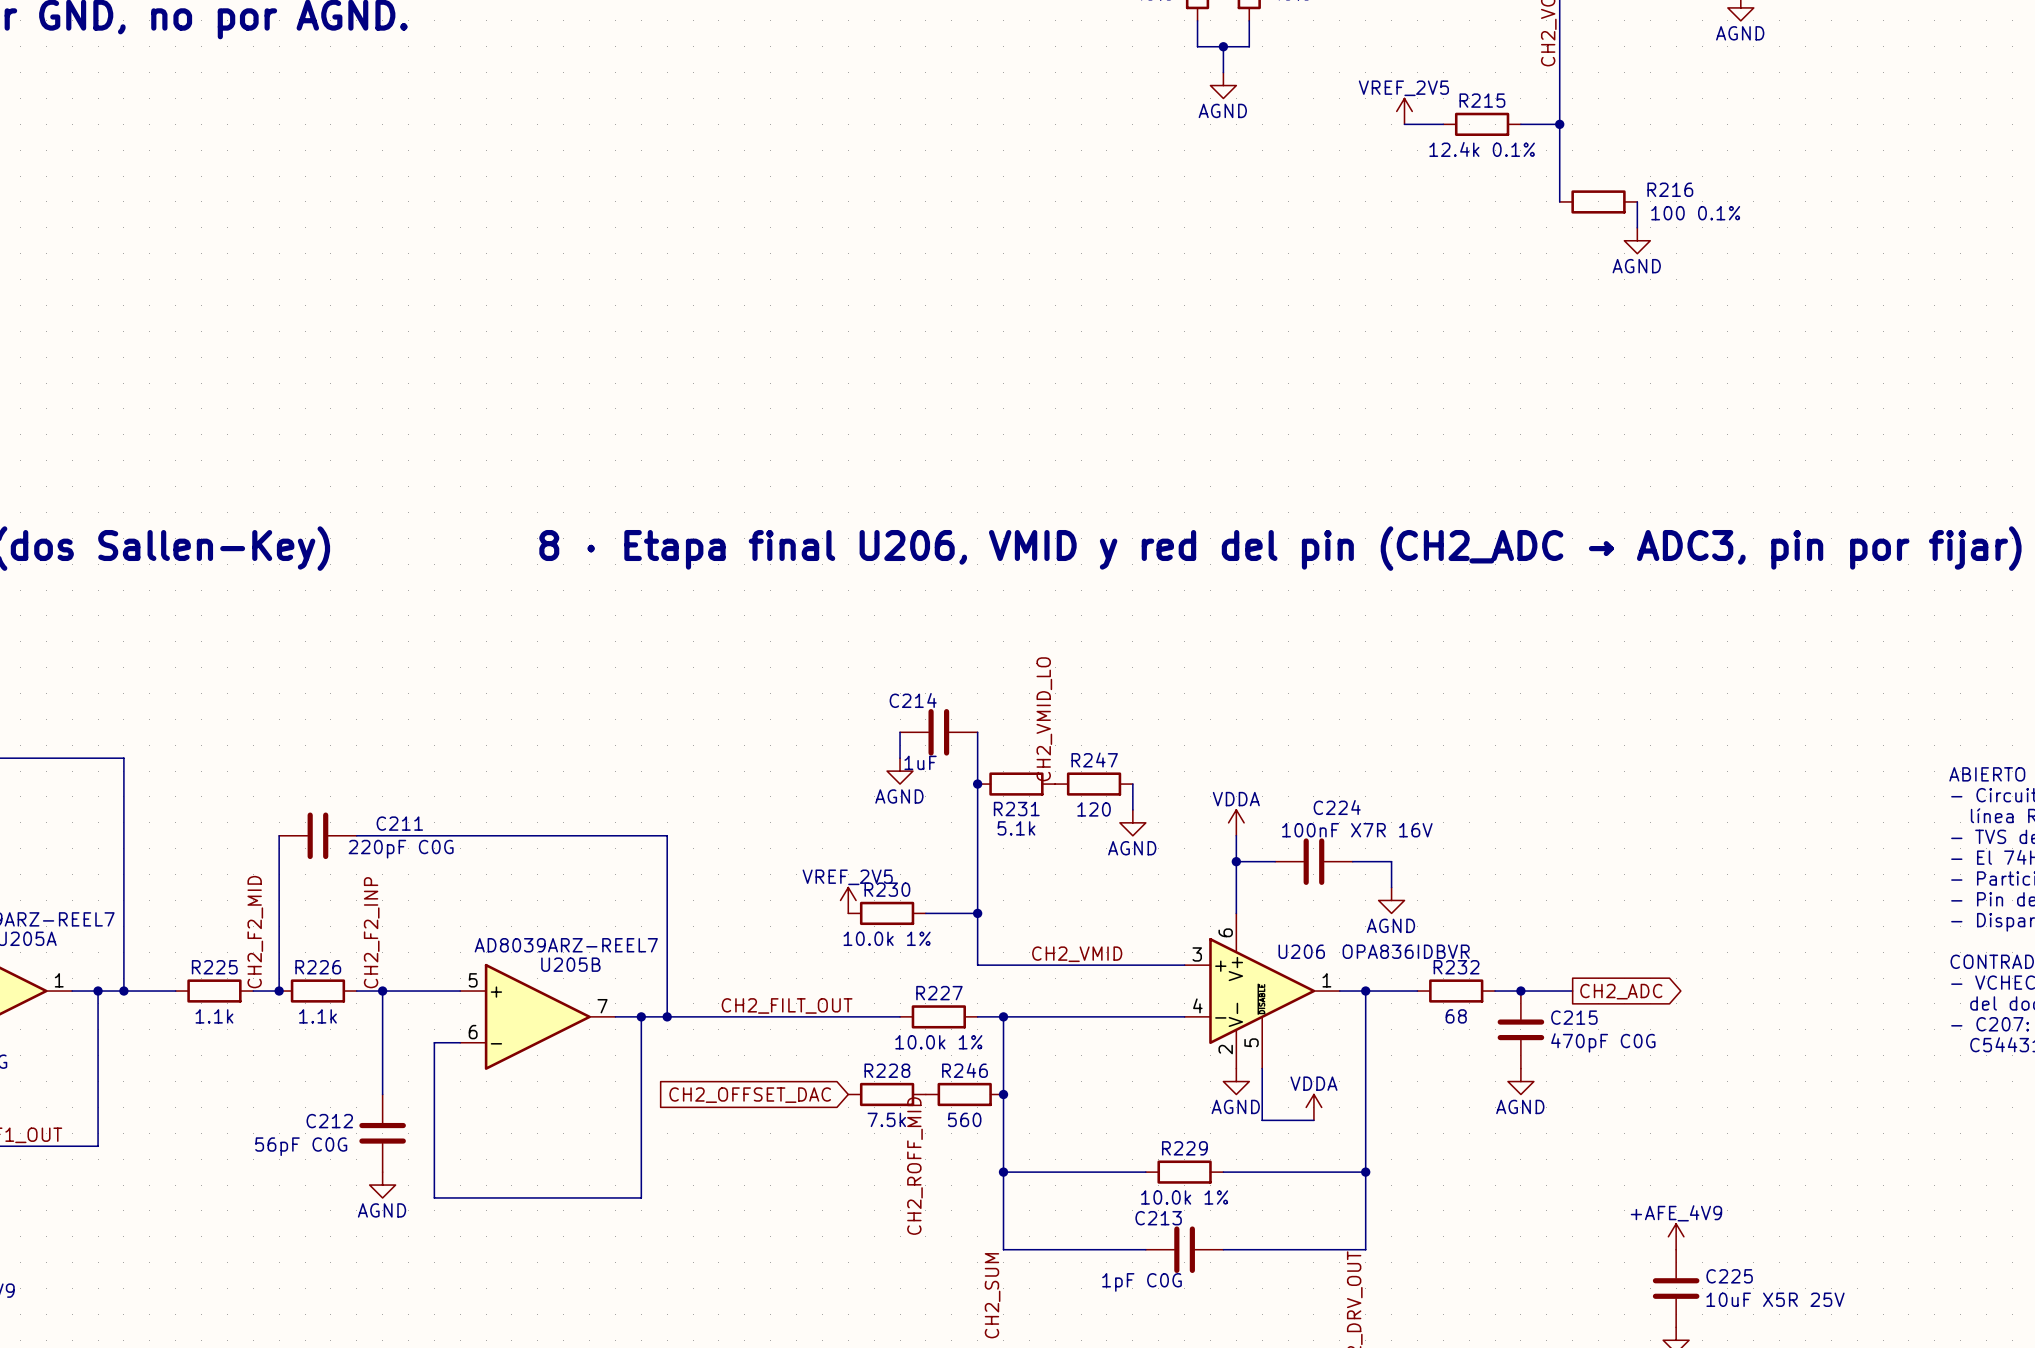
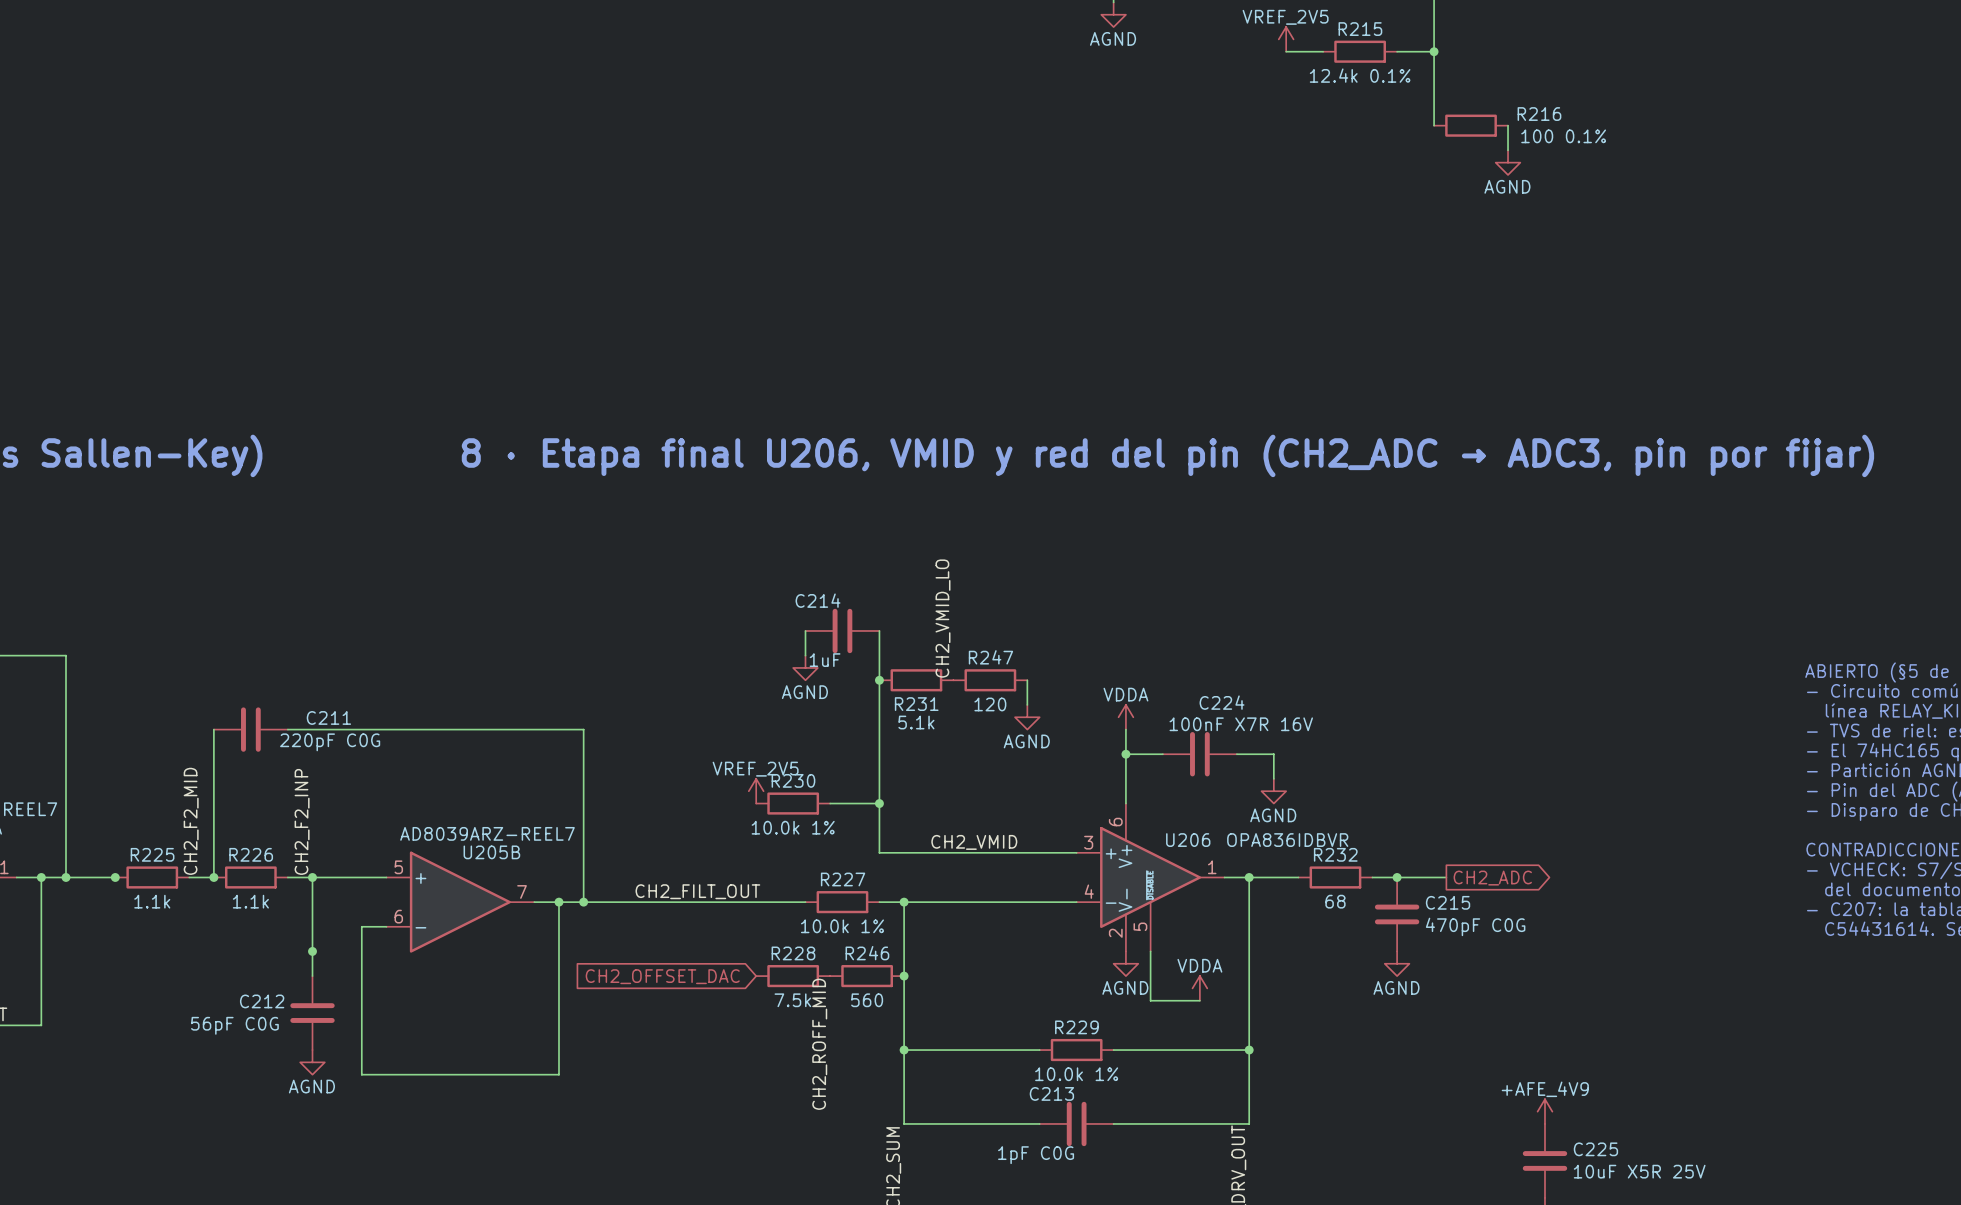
junction: none -> (115, 877)
junction: none -> (312, 951)

